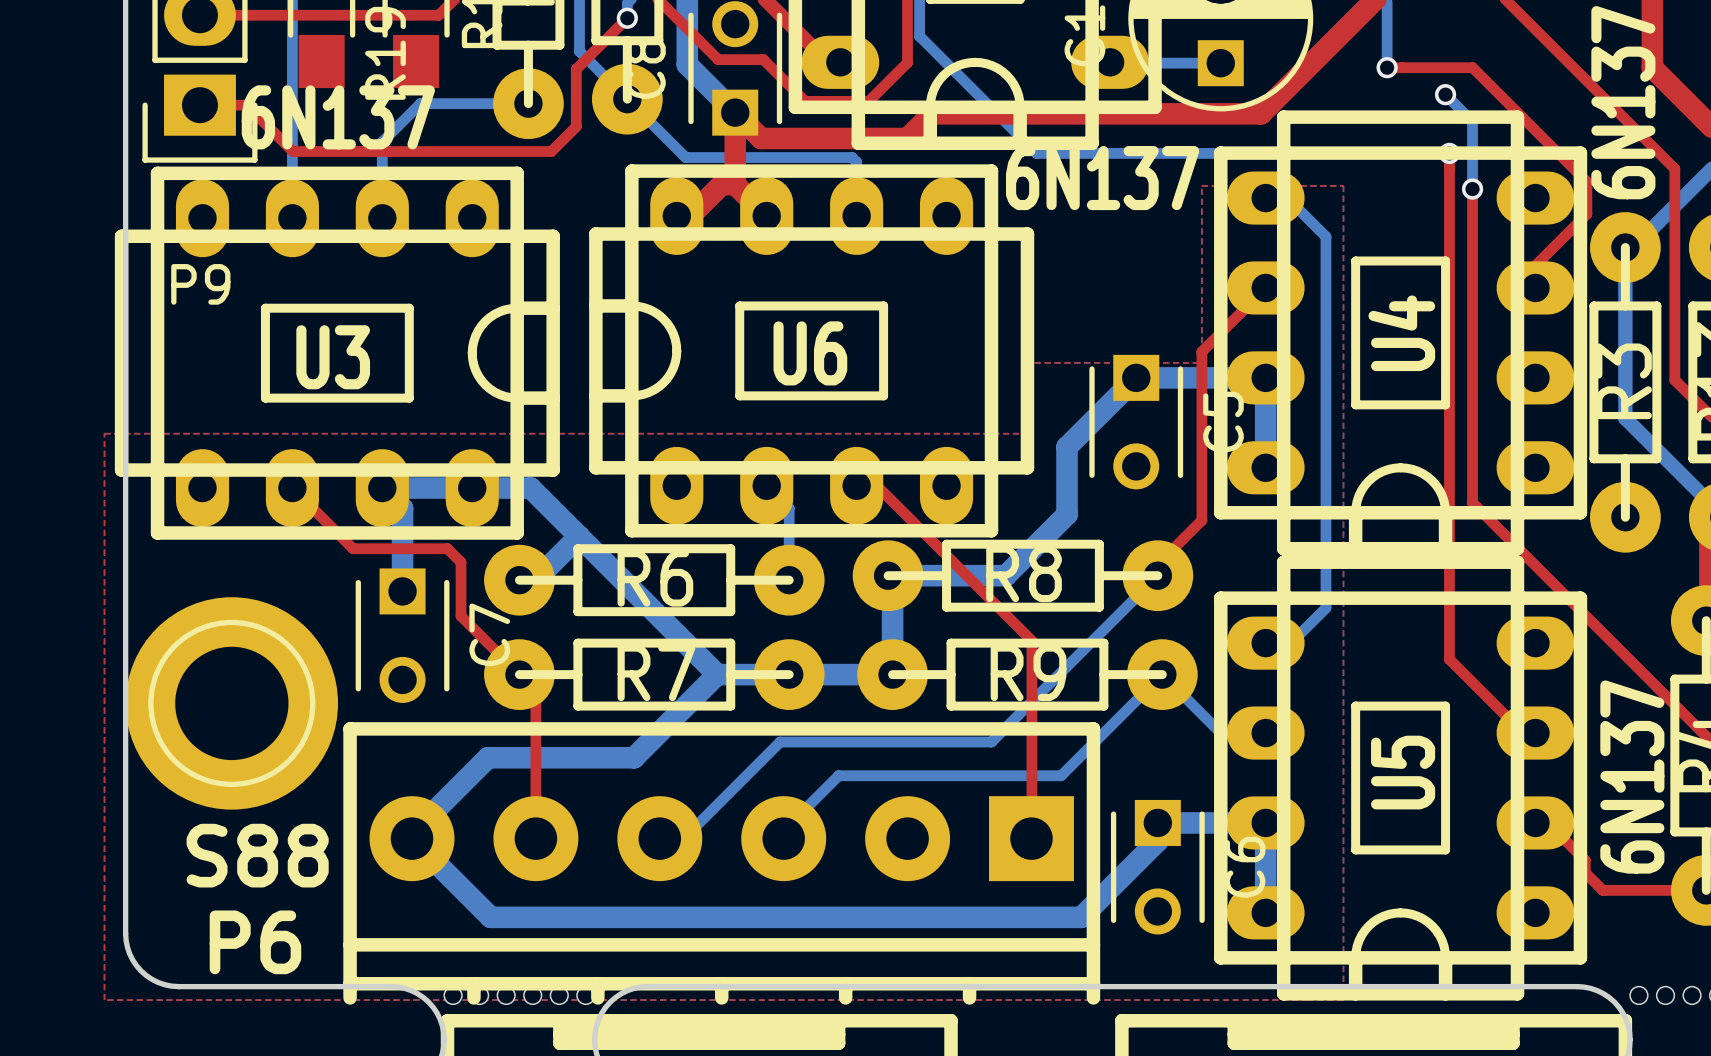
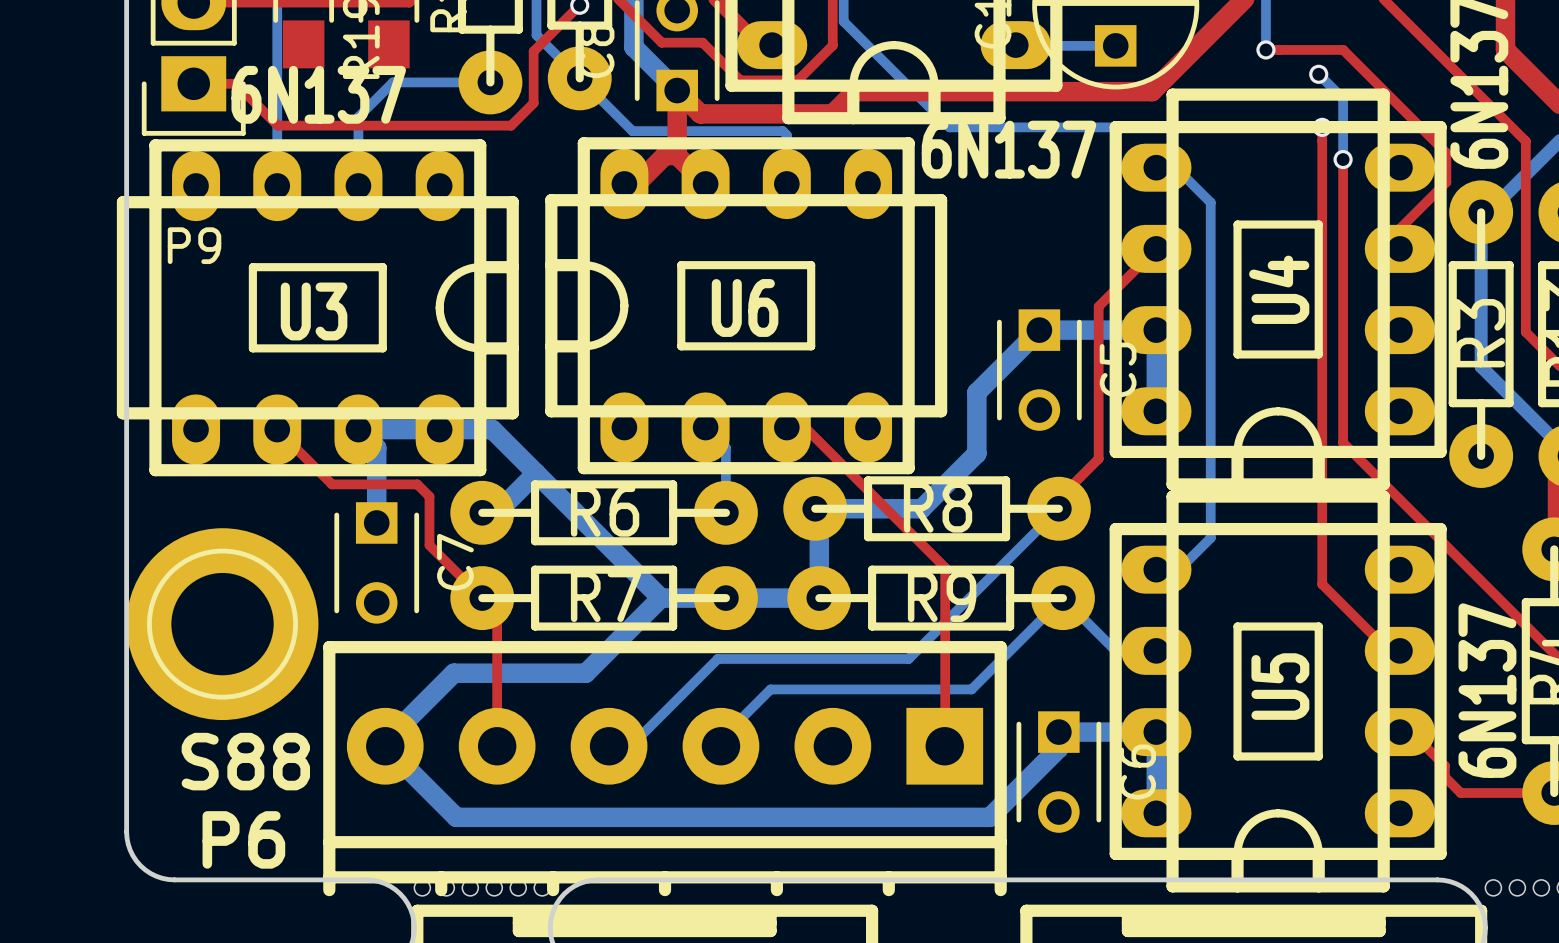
top zone outline: (1201, 185) (1201, 362) (1024, 362) (1024, 433) (104, 433) (104, 1000) (1343, 1000) (1343, 185) (1201, 185) -> none

